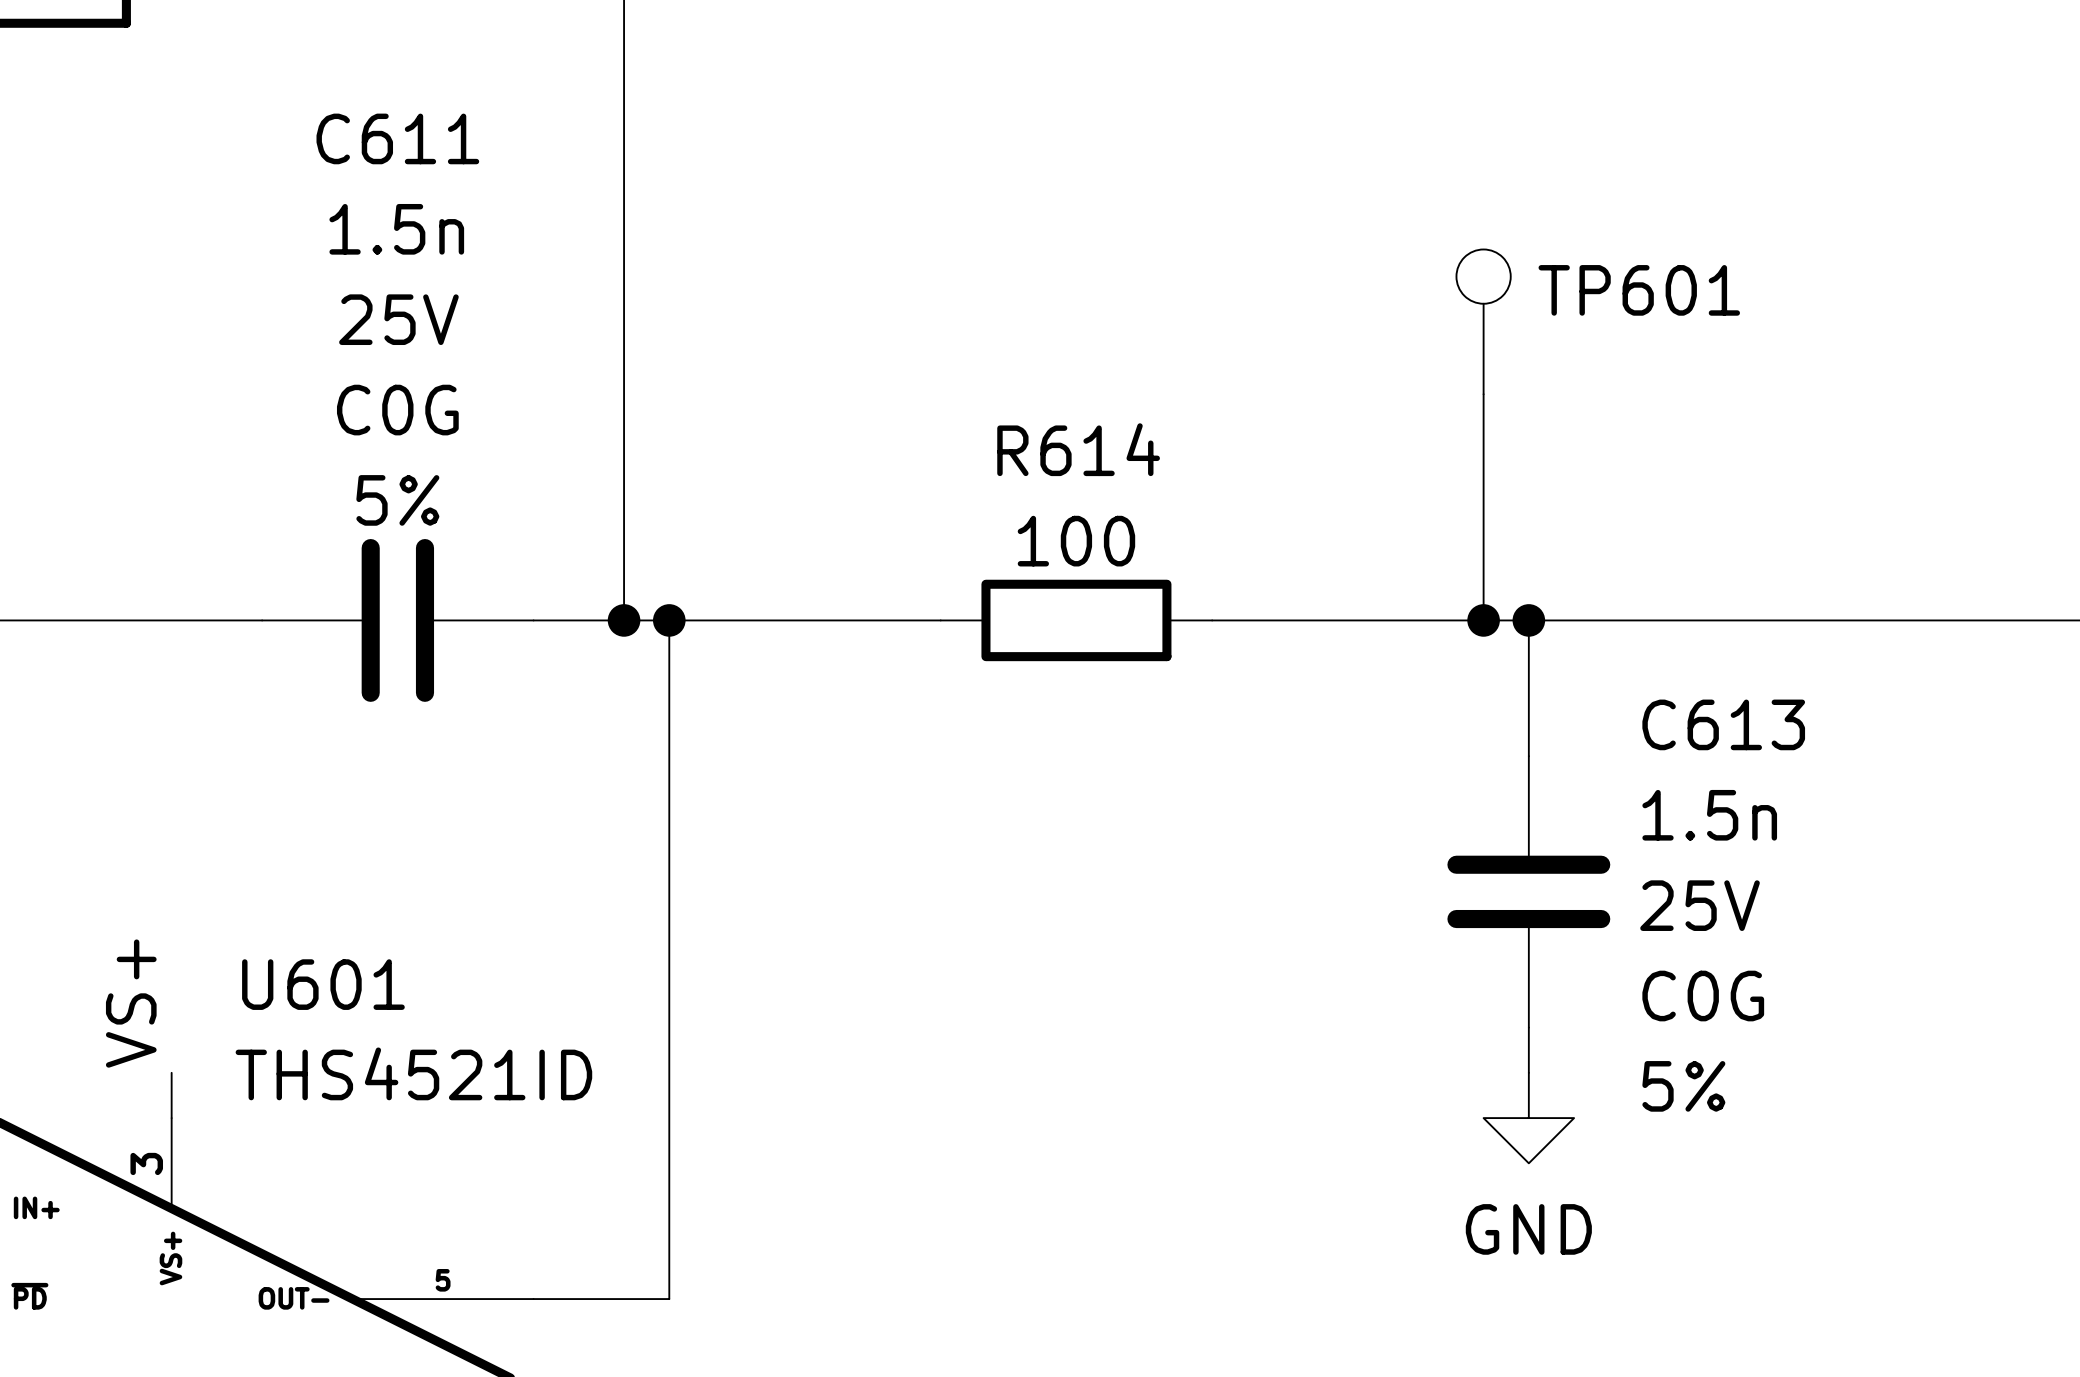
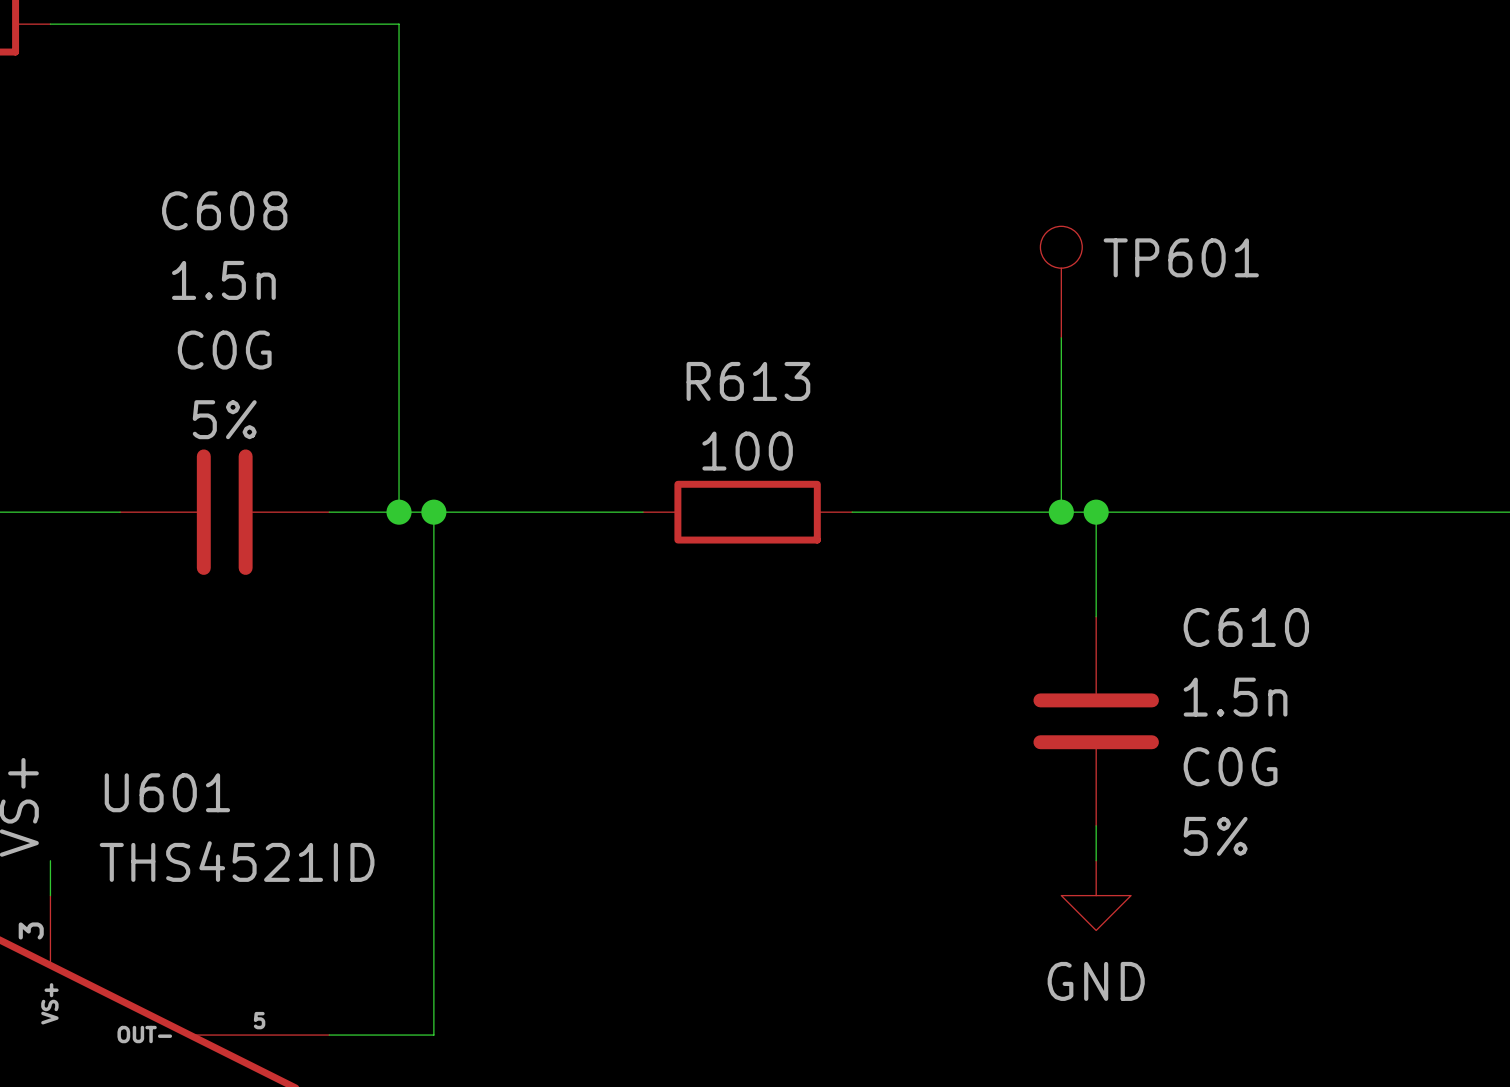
C611 name: C611 (397, 138) -> C608 (224, 210)
C611 value position: 1.5n (396, 229) -> 1.5n (223, 280)
C611 text: 25V (398, 319) -> none
R614 name: R614 (1078, 449) -> R613 (748, 381)
C613 name: C613 (1723, 724) -> C610 (1246, 627)
C613 value position: 1.5n (1709, 815) -> 1.5n (1235, 697)
C613 text: 25V (1700, 905) -> none
C613 text position: C0G (1703, 996) -> C0G (1230, 766)
C613 text position: 5% (1683, 1086) -> 5% (1215, 836)

